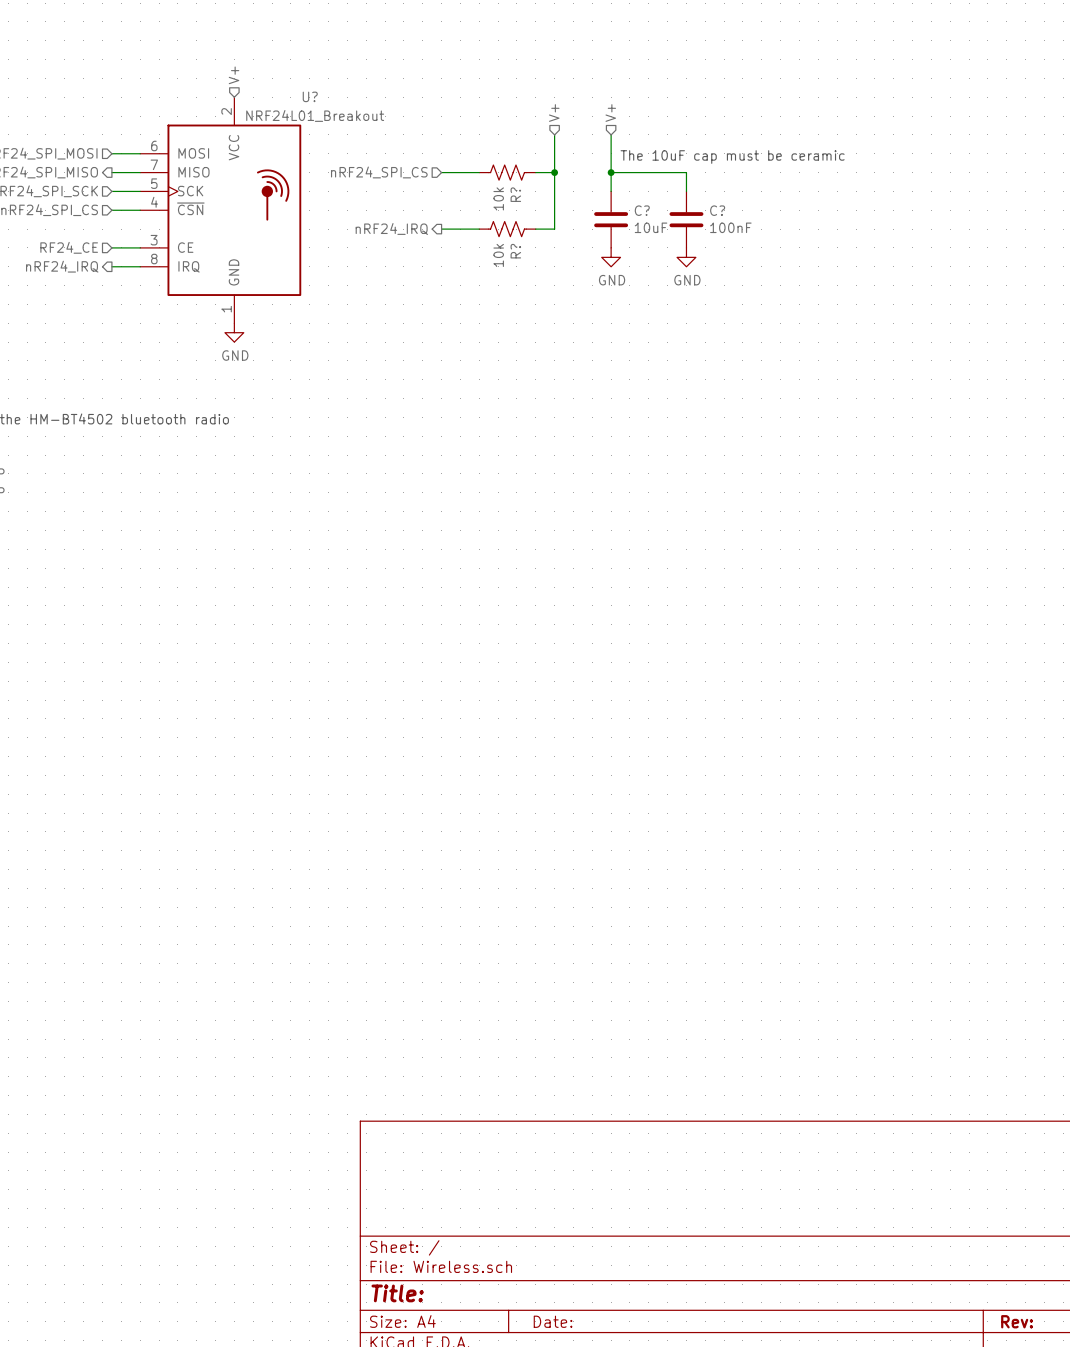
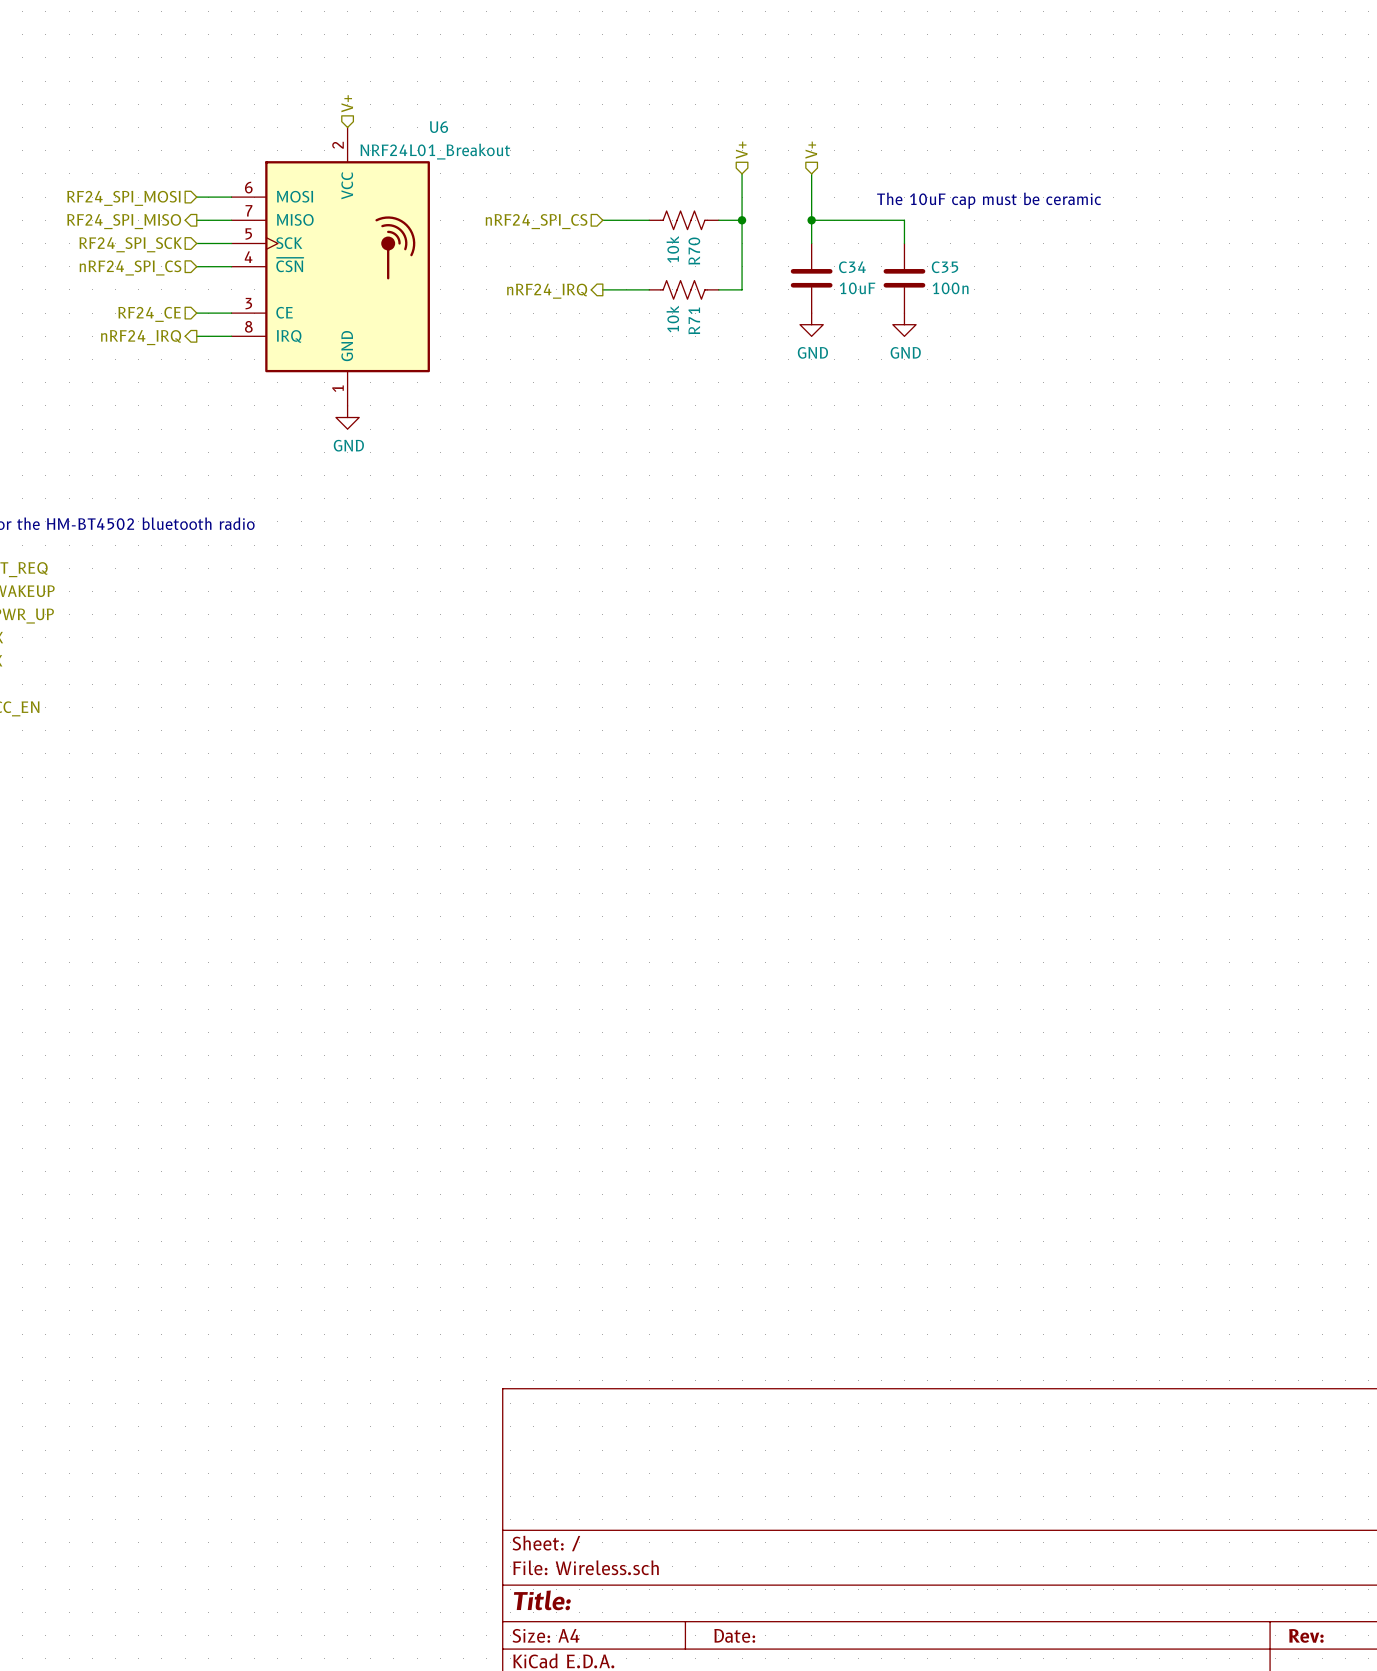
U? name: U? (310, 96) -> U6 (439, 127)
R? name: R? (515, 194) -> R70 (694, 251)
C? name: C? (642, 210) -> C34 (852, 267)
C? name: C? (717, 210) -> C35 (945, 267)
C? value: 100nF (730, 227) -> 100n (950, 288)
R? name: R? (515, 251) -> R71 (694, 320)

